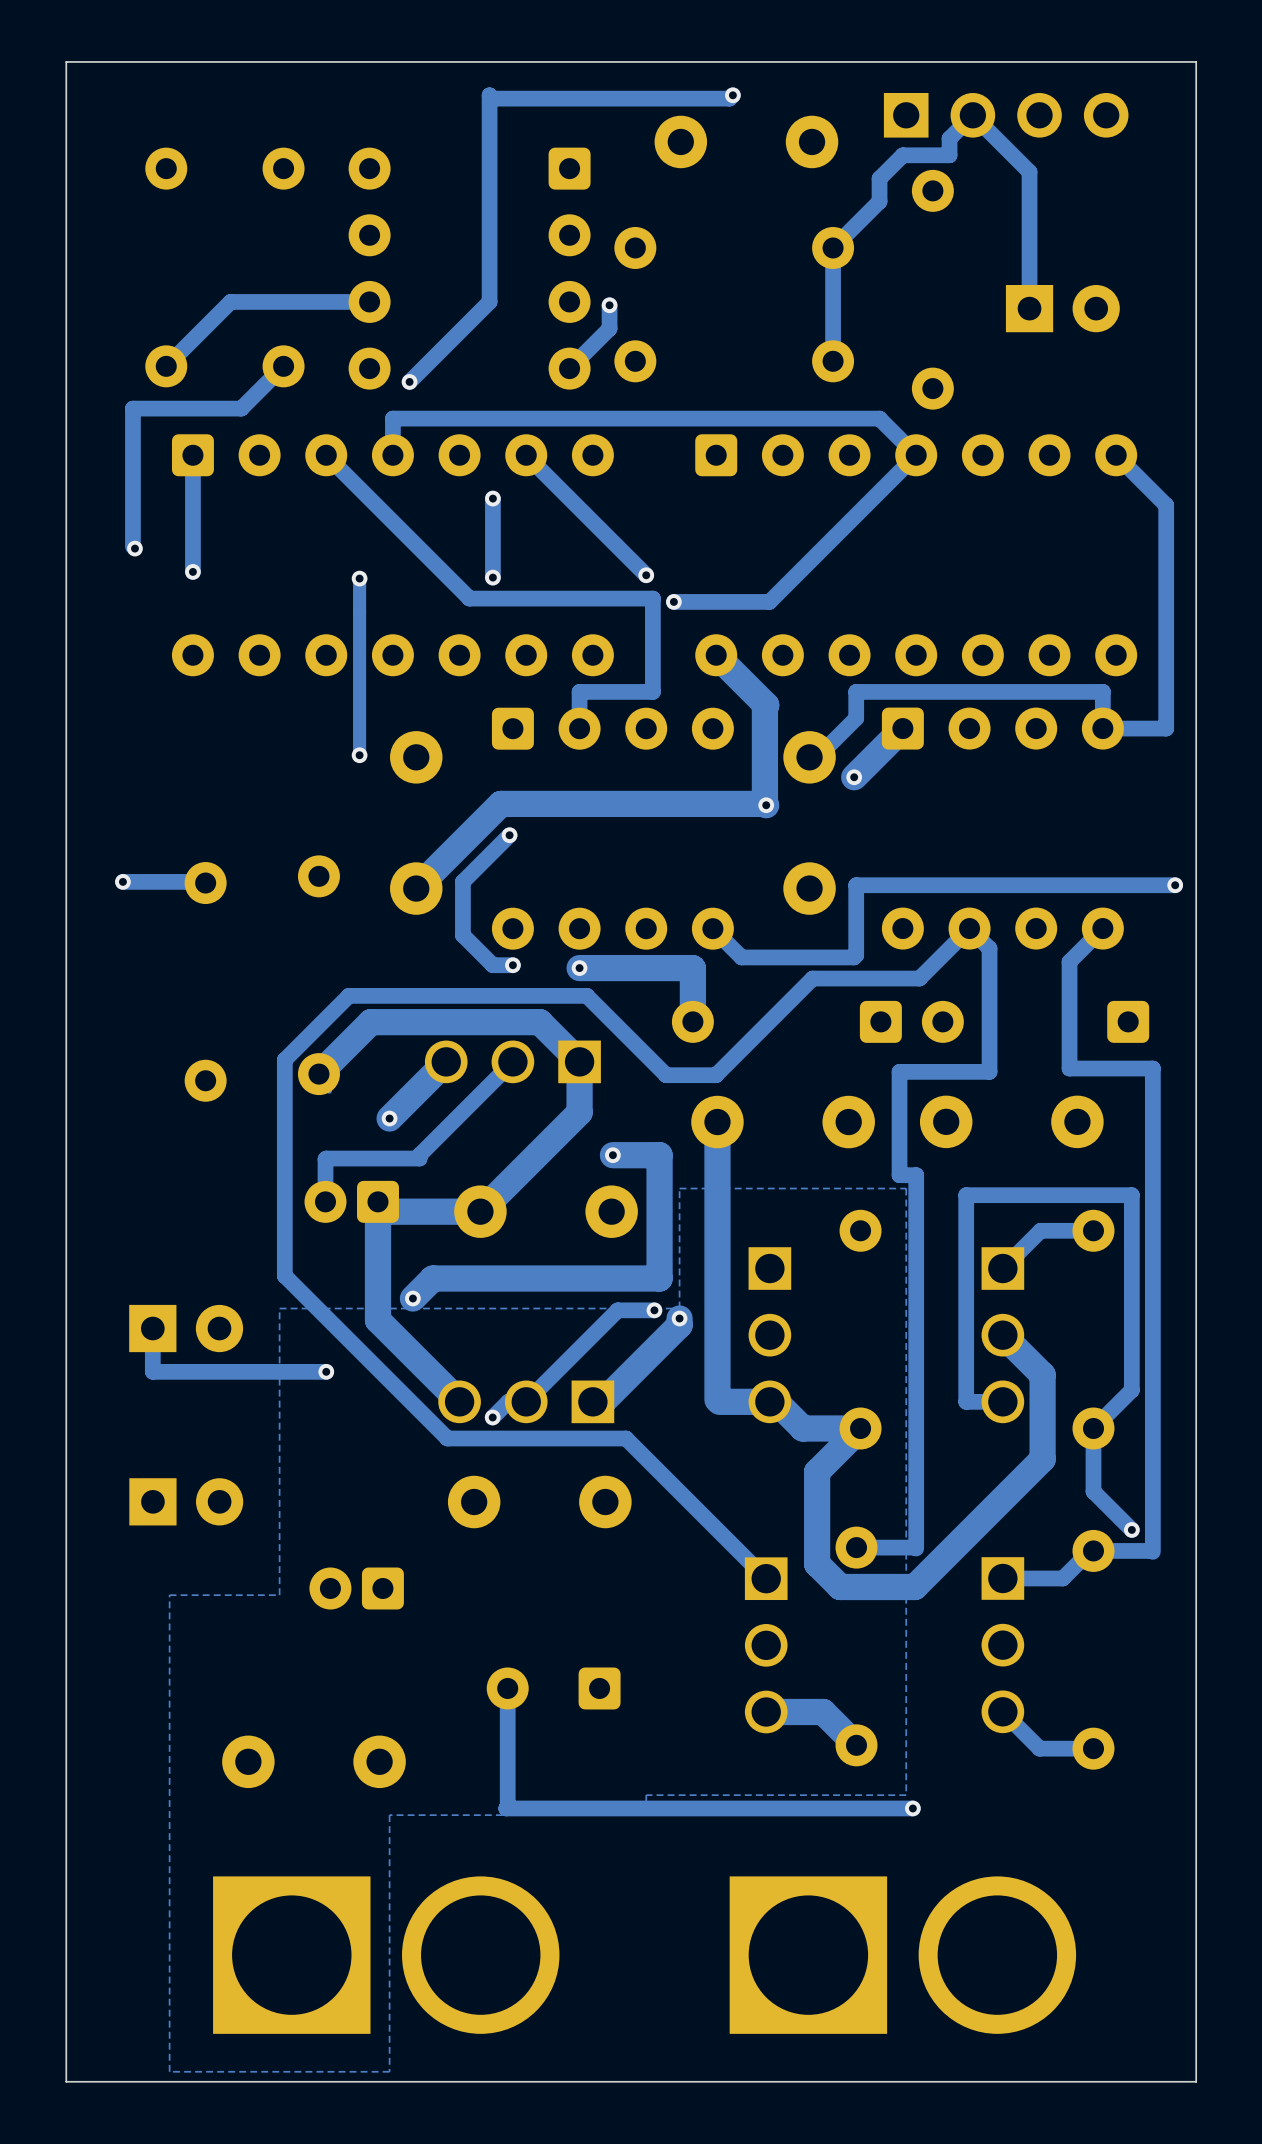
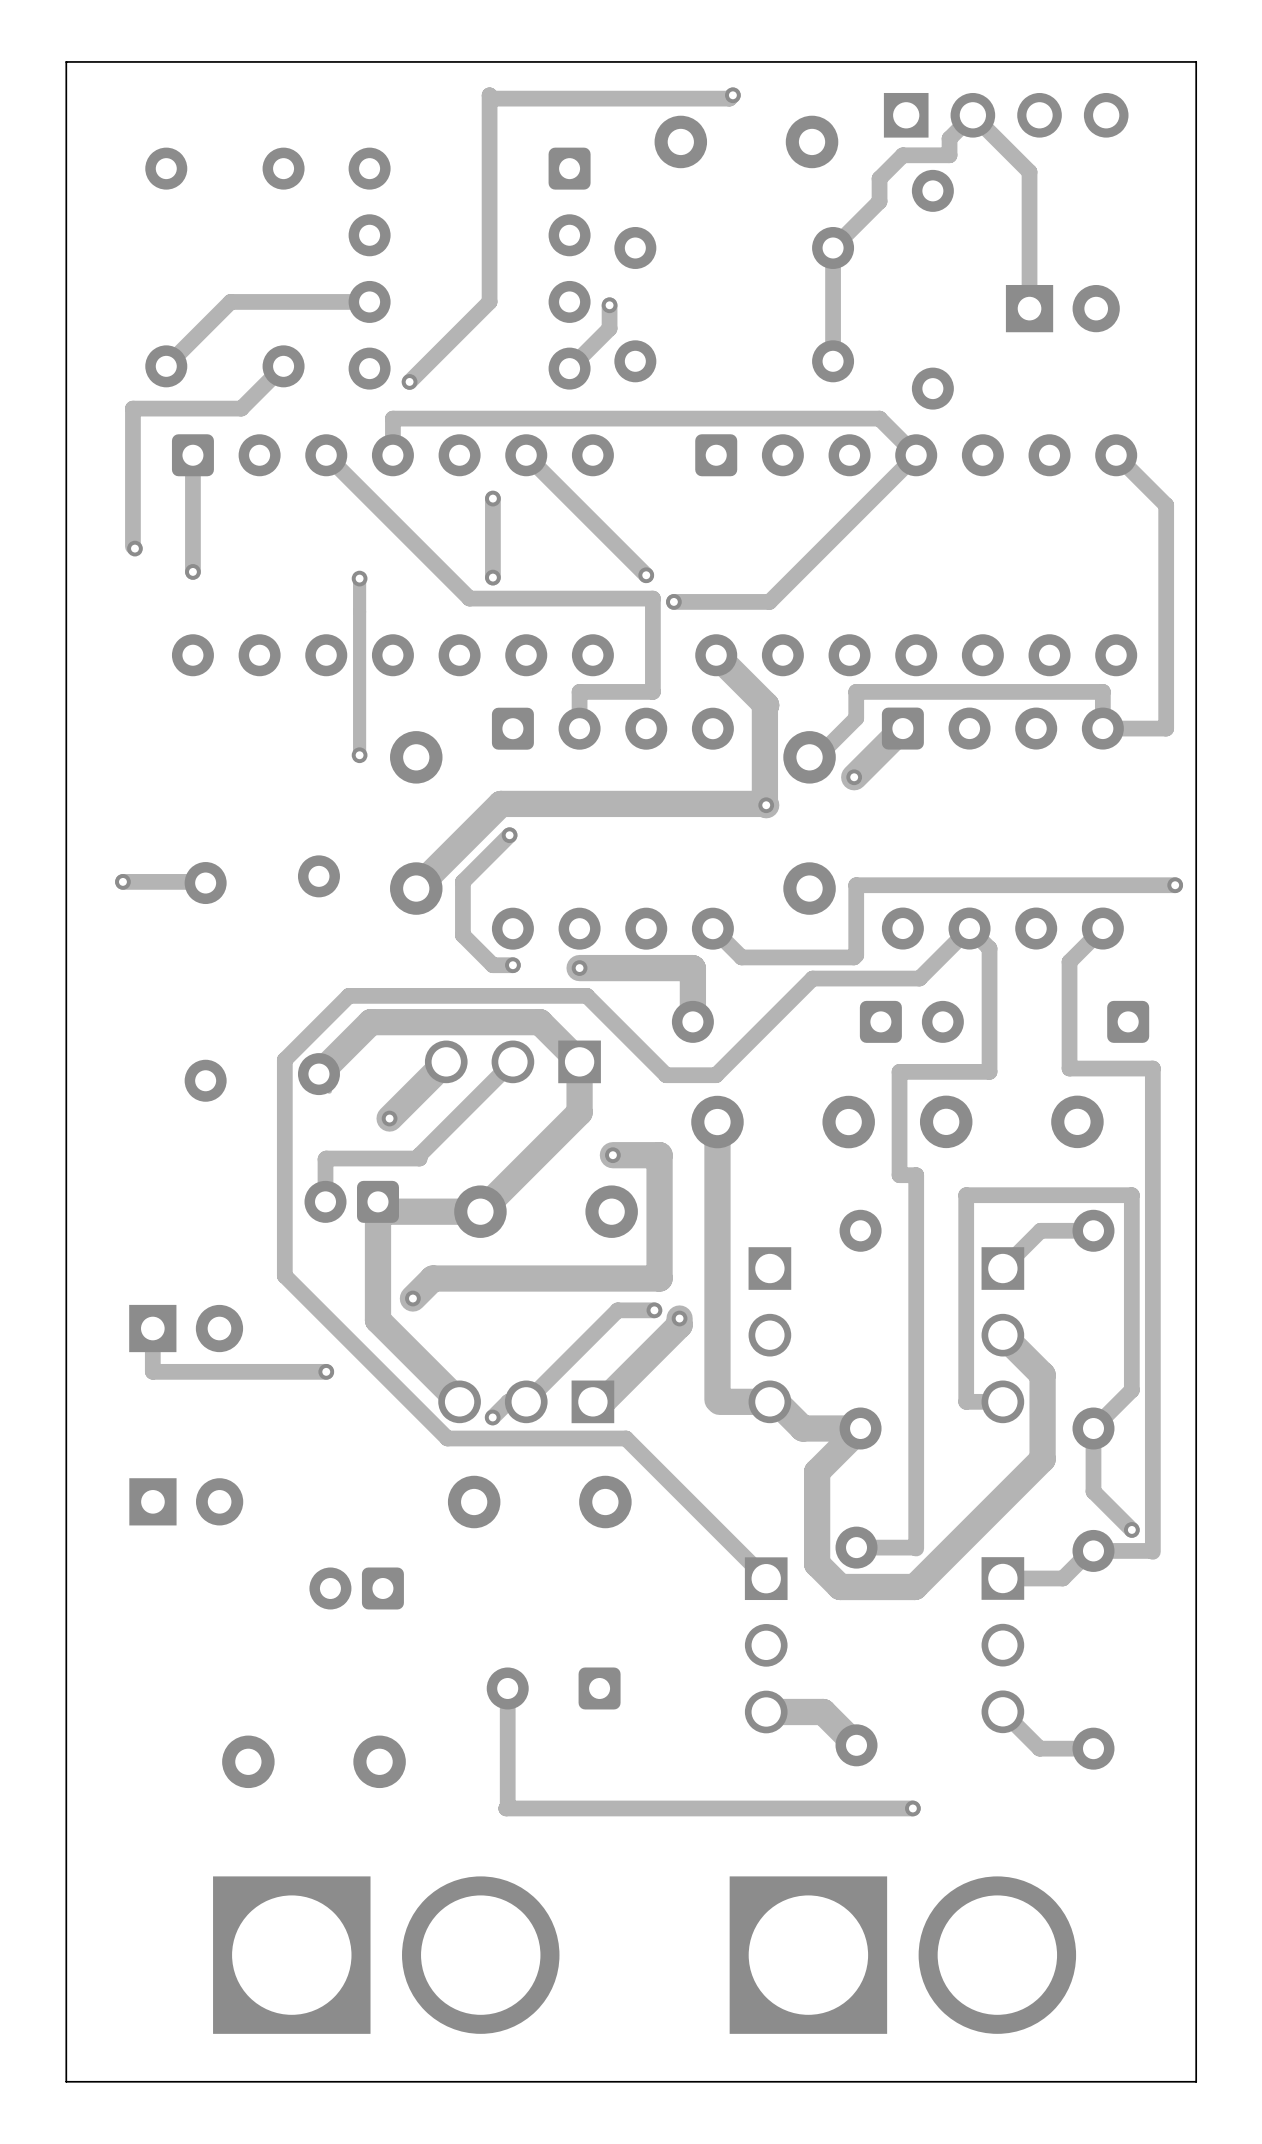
zone outline: (906, 1188) (906, 1795) (646, 1795) (646, 1815) (389, 1815) (389, 2071) (169, 2071) (169, 1595) (279, 1595) (279, 1308) (679, 1308) (679, 1188) (906, 1188) -> none

